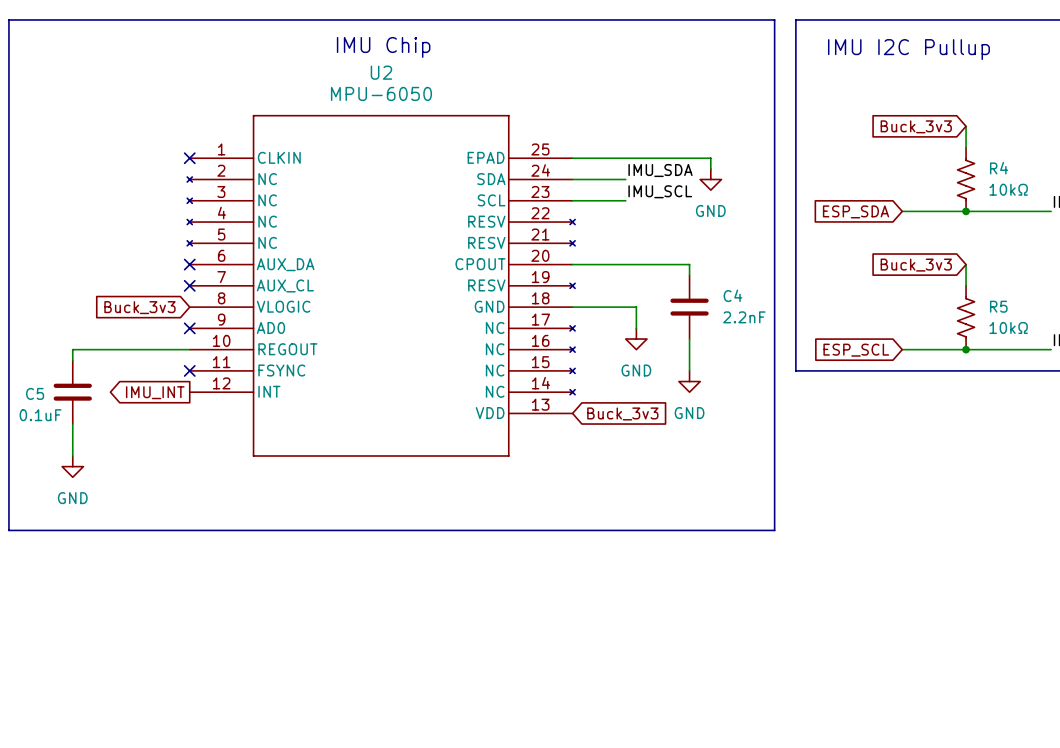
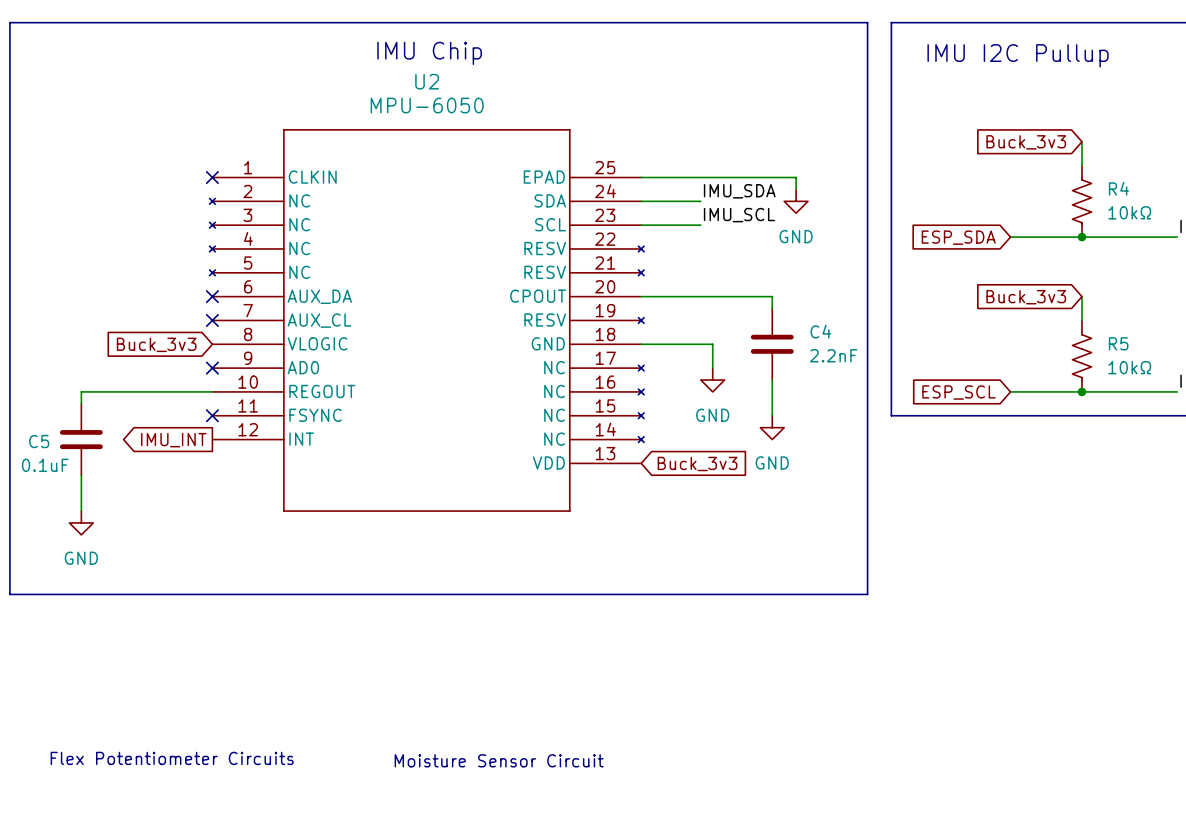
text: none -> Flex Potentiometer Circuits (172, 758)
text: none -> Moisture Sensor Circuit (499, 760)

